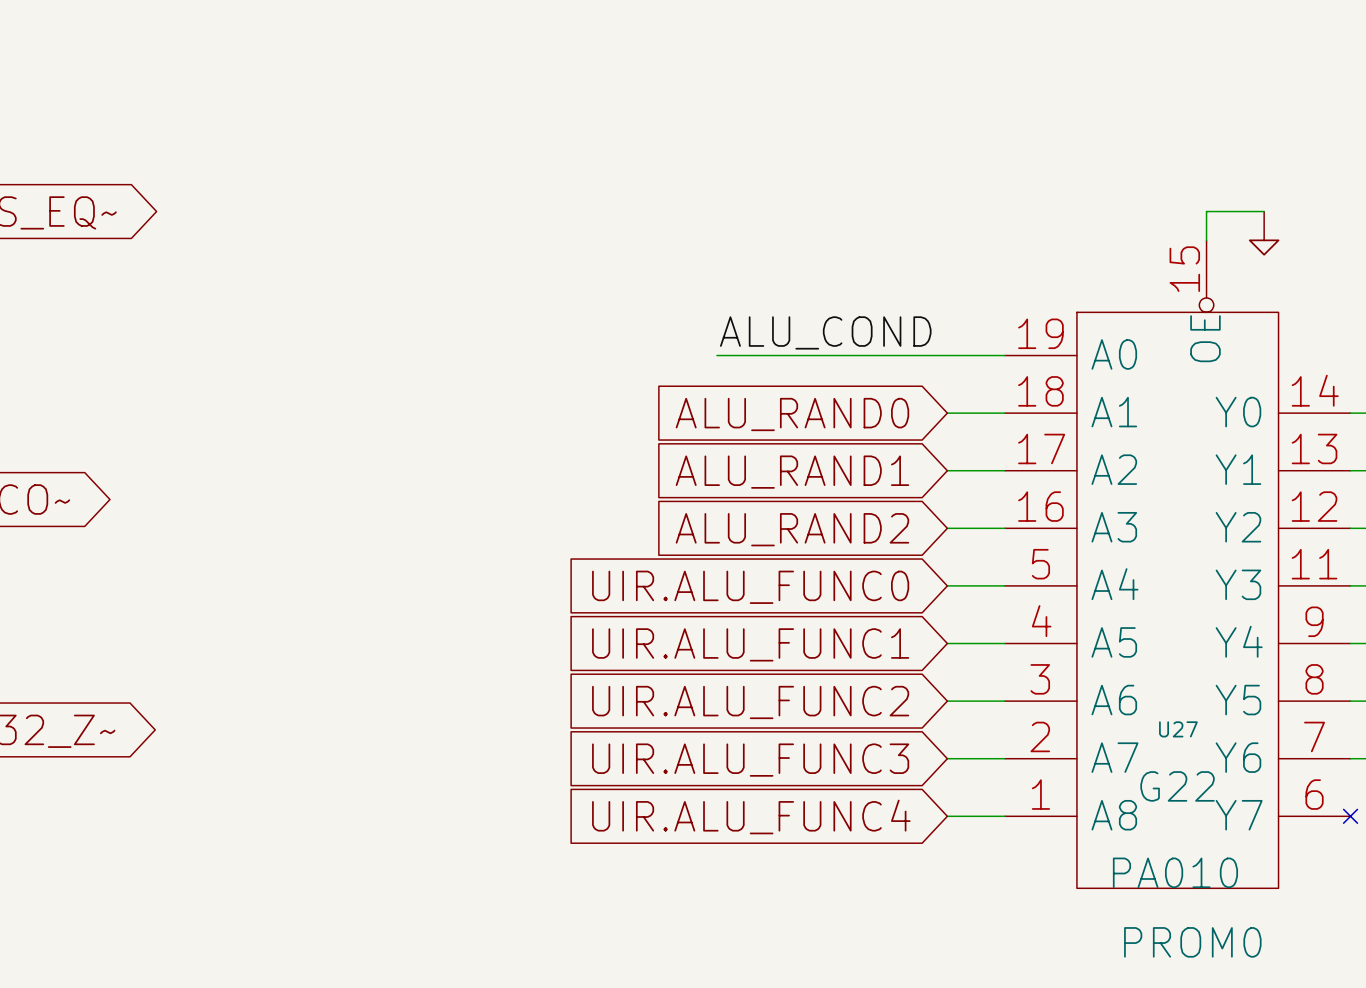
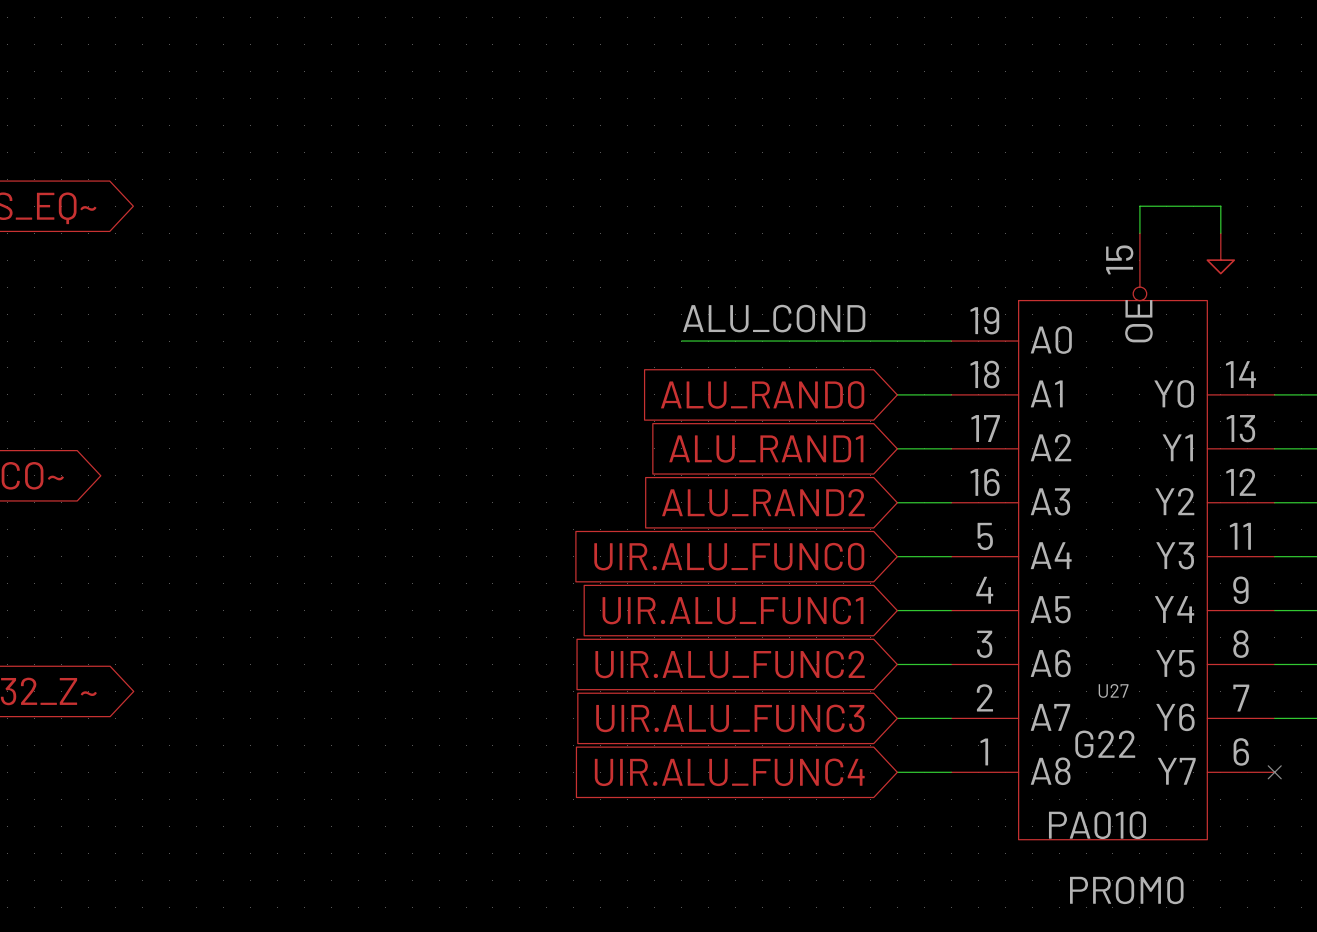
wire: none -> (1193, 206) (1220, 206) (1220, 233)
power symbol position: (1264, 233) -> (1220, 253)

